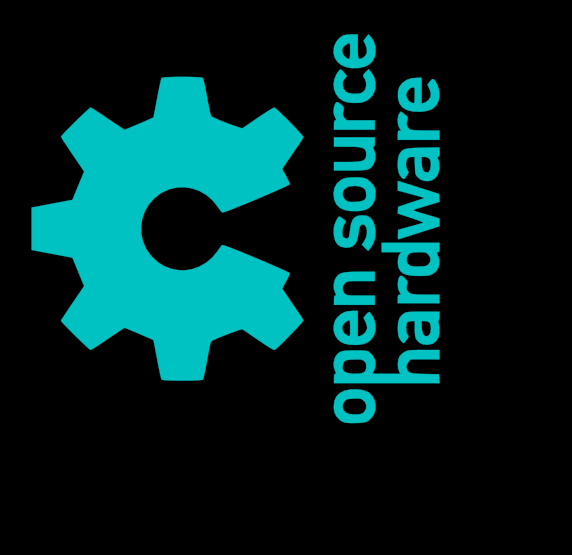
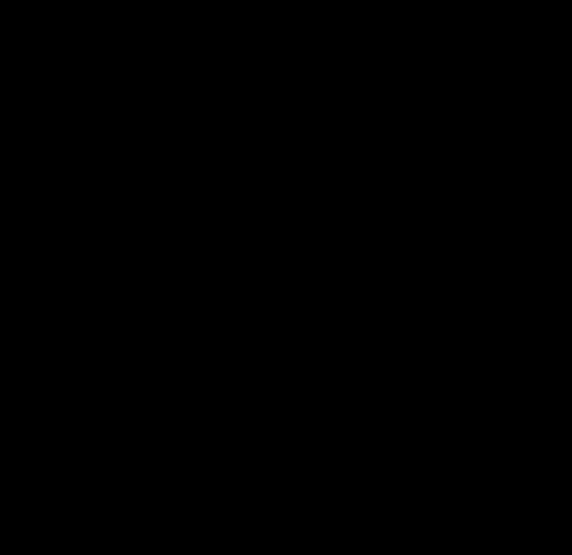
drawing: [31, 34, 440, 424] -> none

